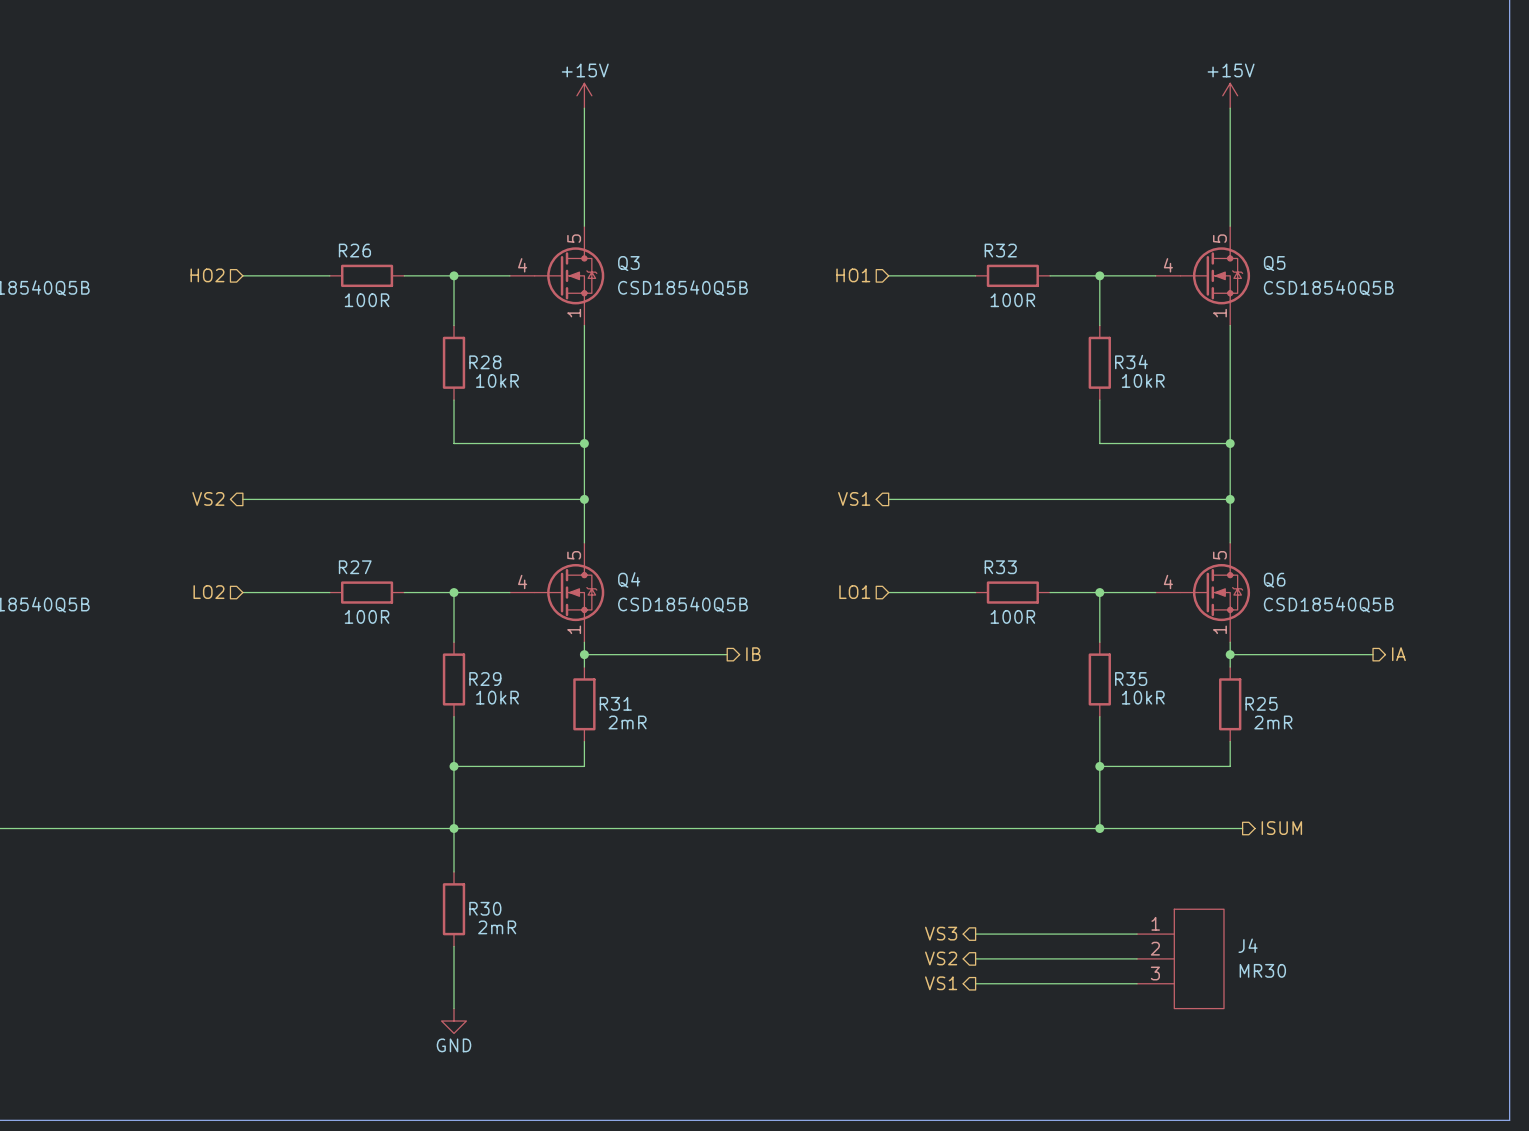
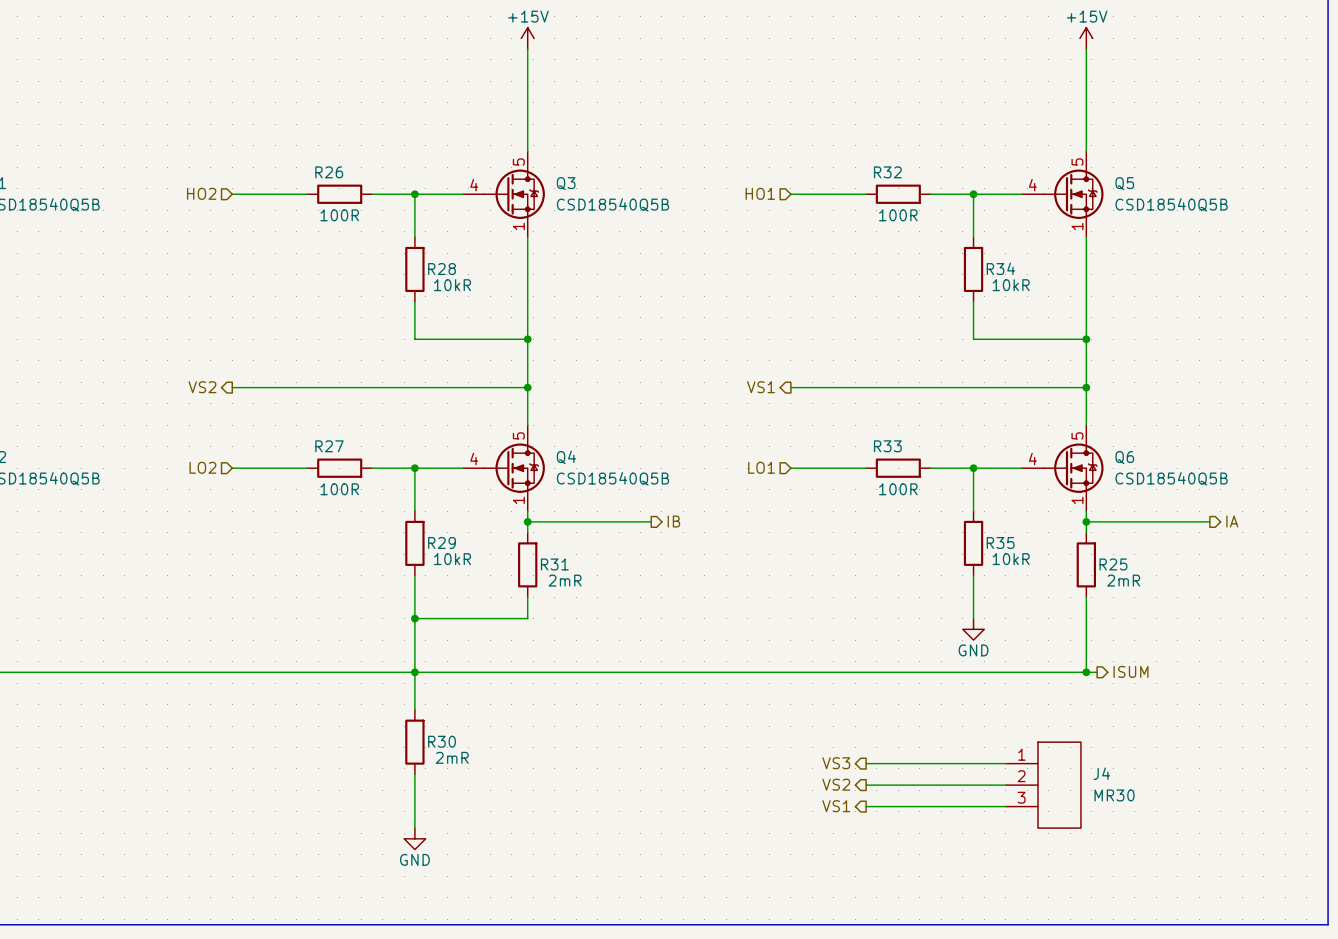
junction: (1099, 766) -> none
wire: (1230, 766) (1099, 766) (1099, 828) -> (1086, 618) (1086, 672)
power symbol: none -> GND (973, 629)
junction: (1099, 828) -> none
junction: none -> (1086, 672)

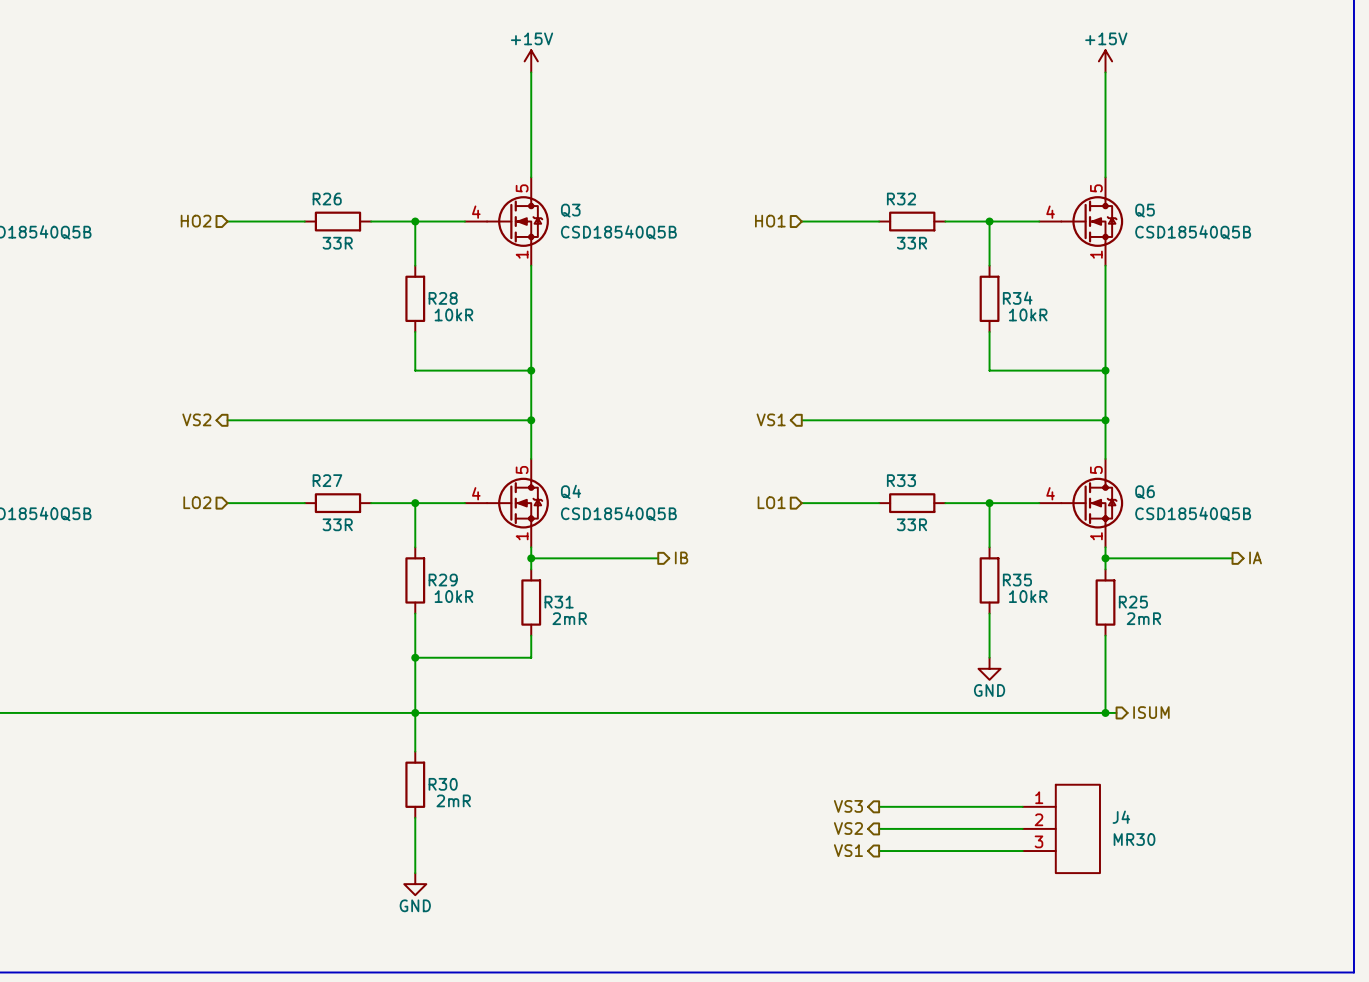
R26 value: 100R (339, 215) -> 33R (337, 243)
R32 value: 100R (898, 215) -> 33R (911, 243)
R27 value: 100R (339, 489) -> 33R (337, 524)
R33 value: 100R (898, 489) -> 33R (911, 524)

